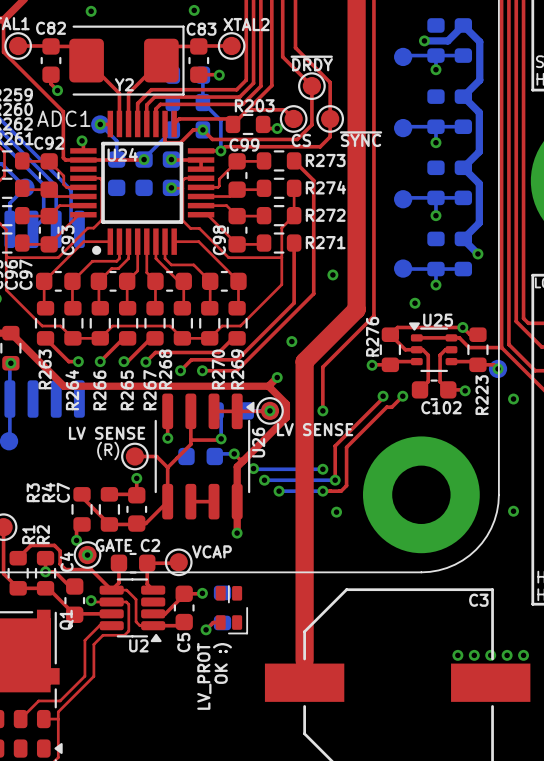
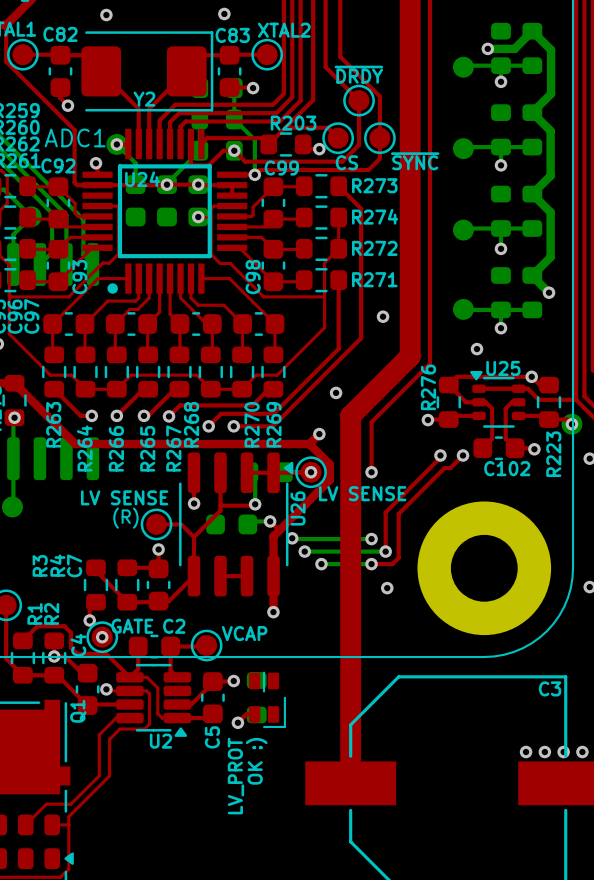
top track: none -> (166, 184) (198, 184)

